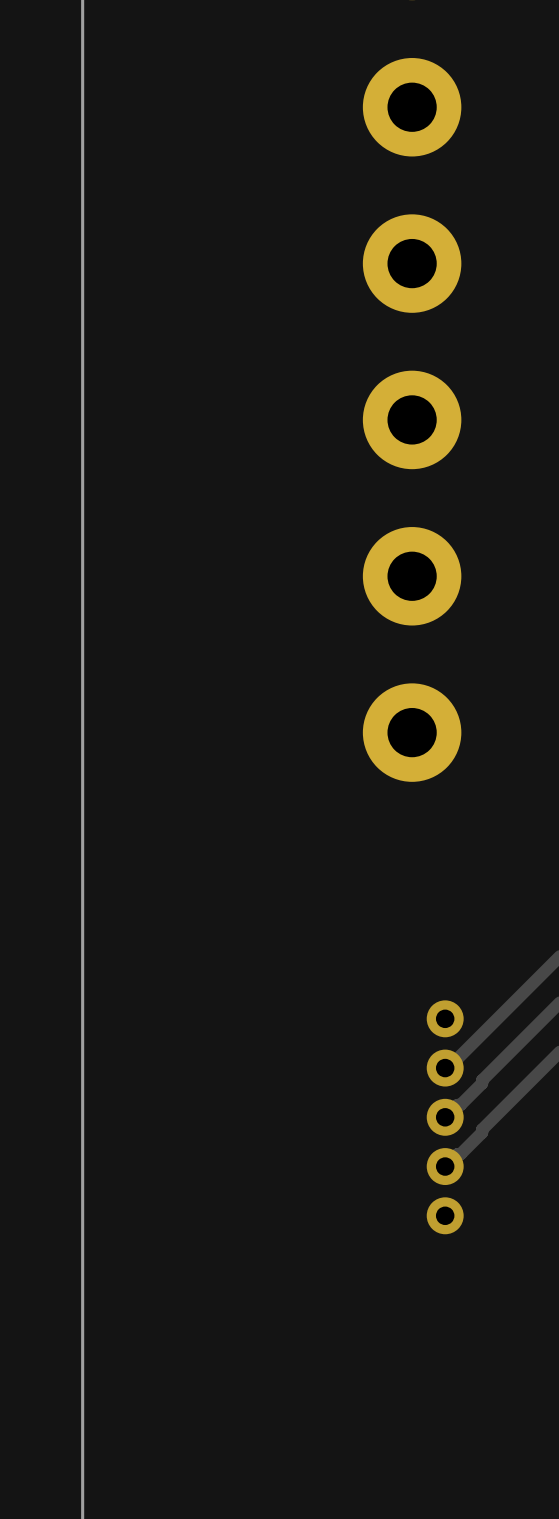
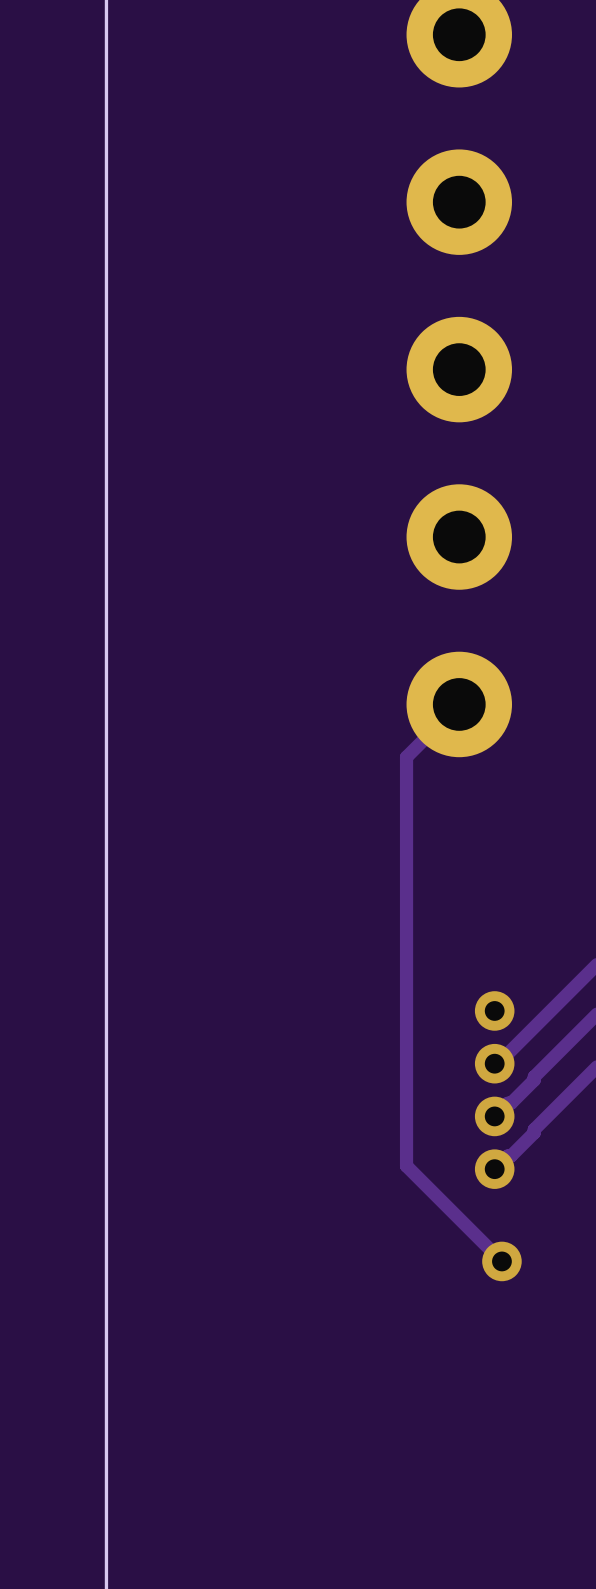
track: none -> (459, 704) (406, 757) (406, 1166) (501, 1261)
via position: (445, 1215) -> (501, 1261)

